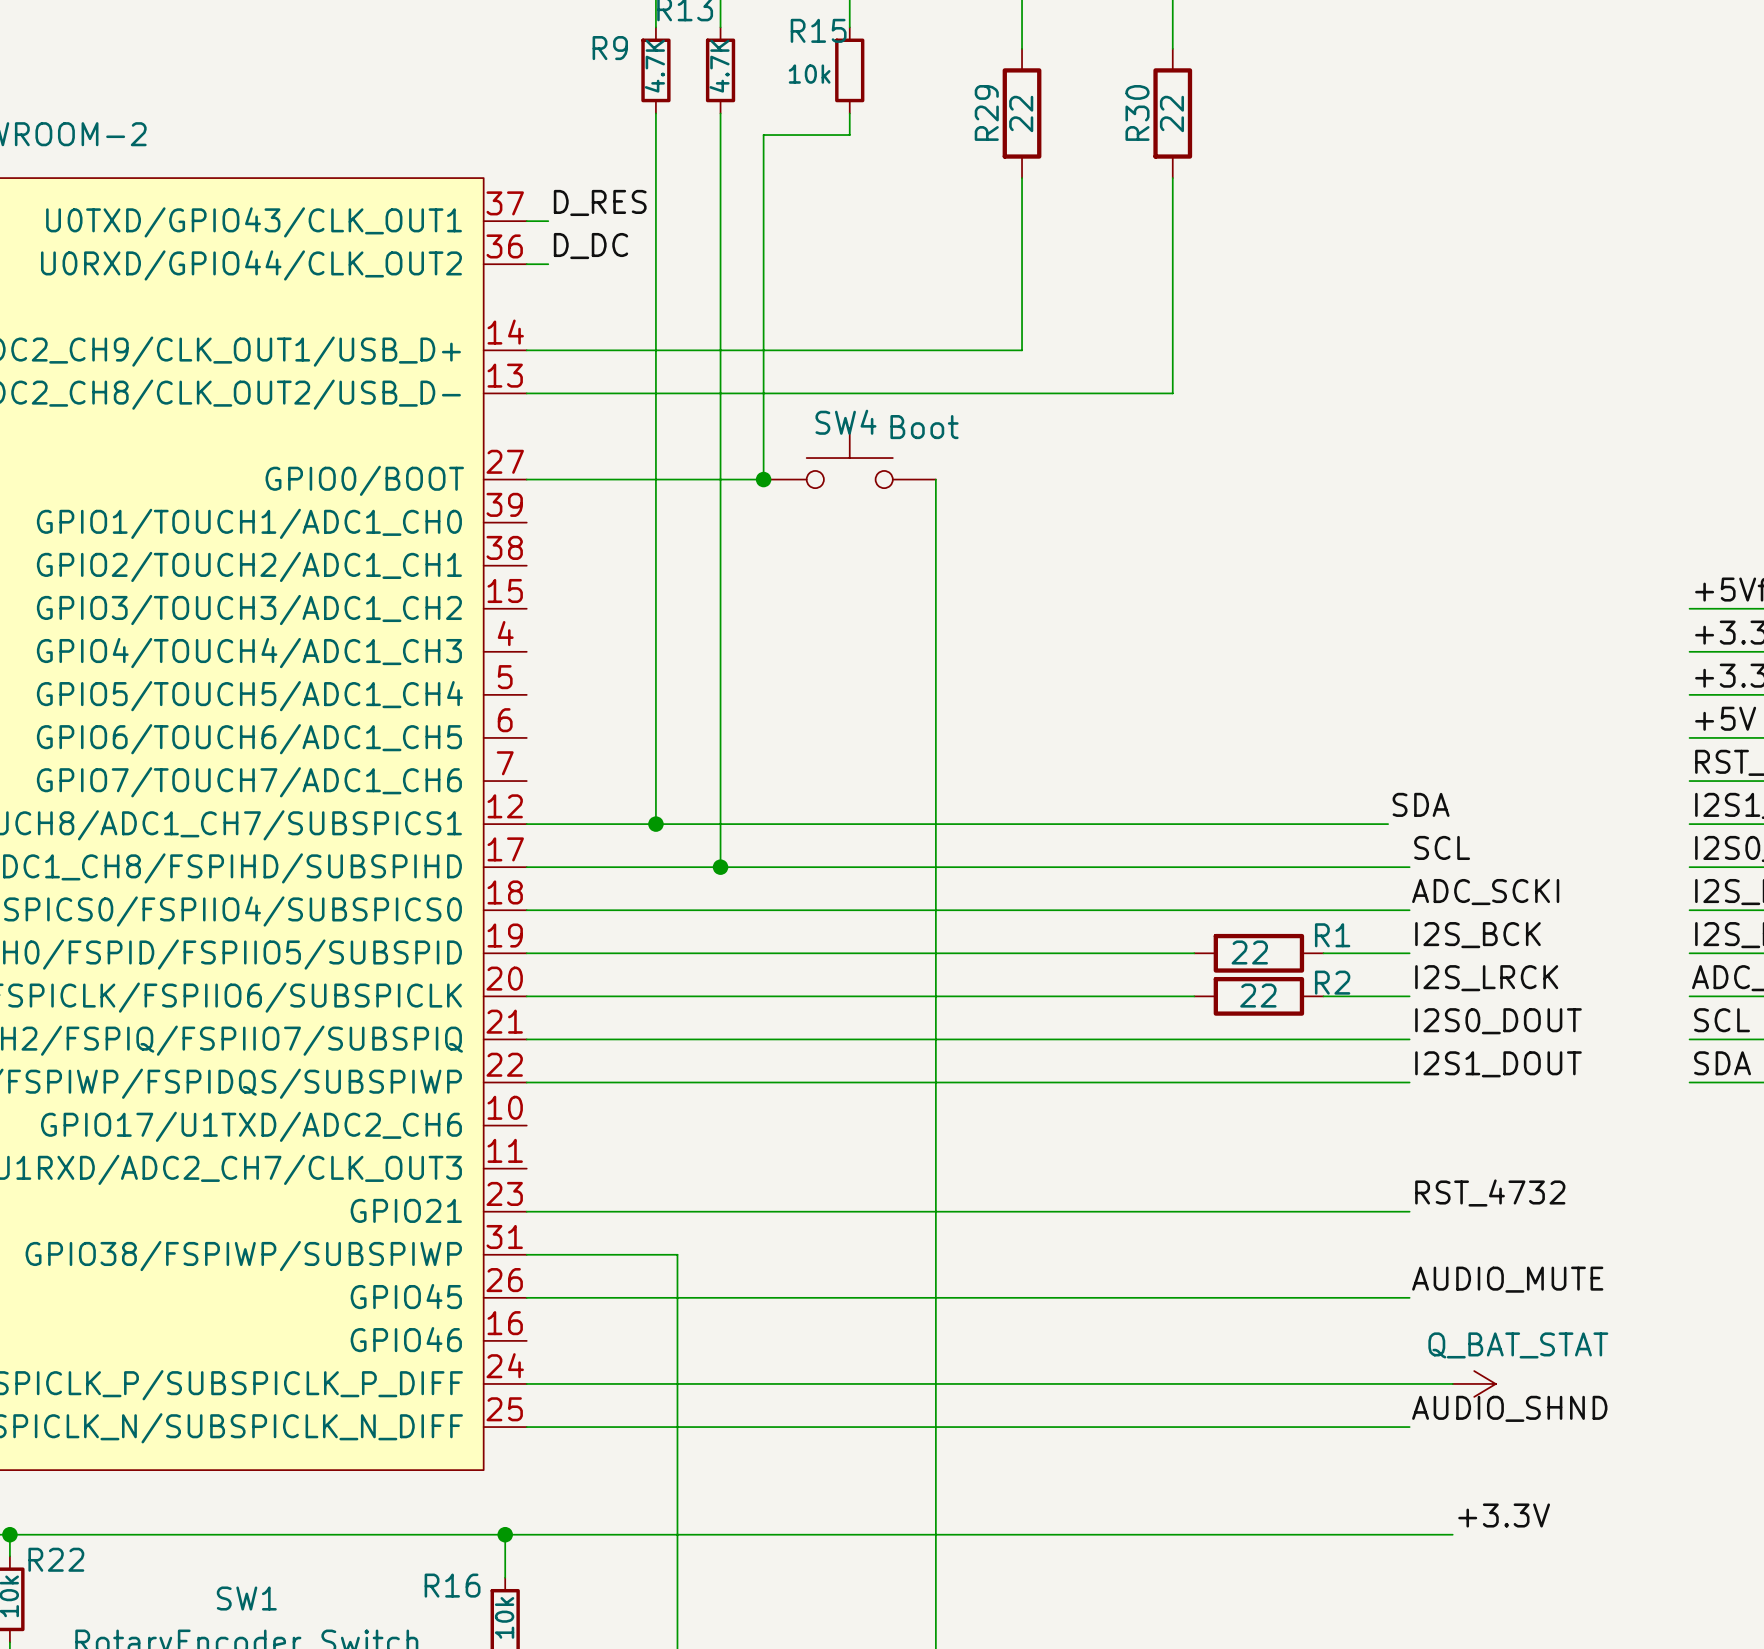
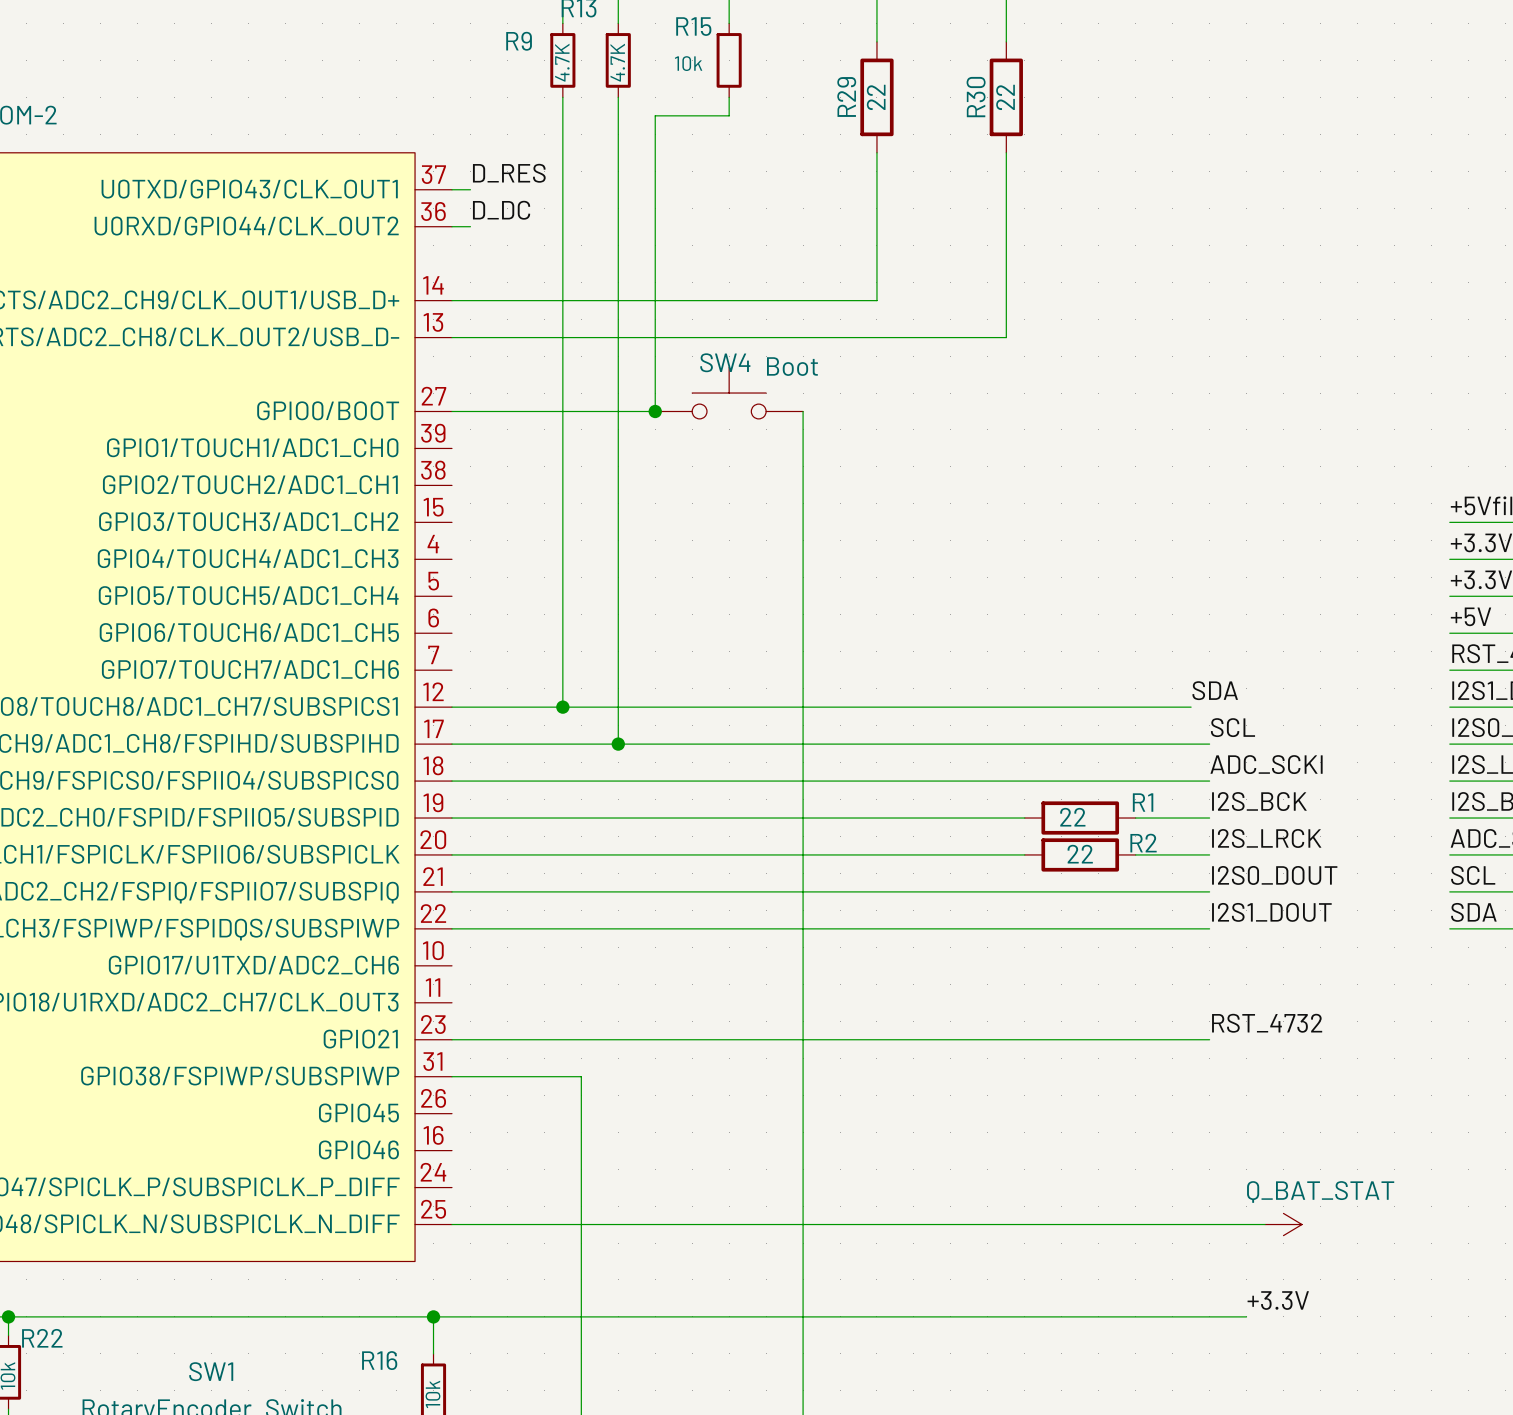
label: AUDIO_MUTE (1507, 1279) -> none
wire: (526, 1297) (1409, 1297) -> none
wire: (526, 1383) (1452, 1383) -> none
power symbol position: Q_BAT_STAT (1474, 1383) -> Q_BAT_STAT (1283, 1224)
label: AUDIO_SHND (1509, 1408) -> none
wire: none -> (1209, 1224) (1265, 1224)

